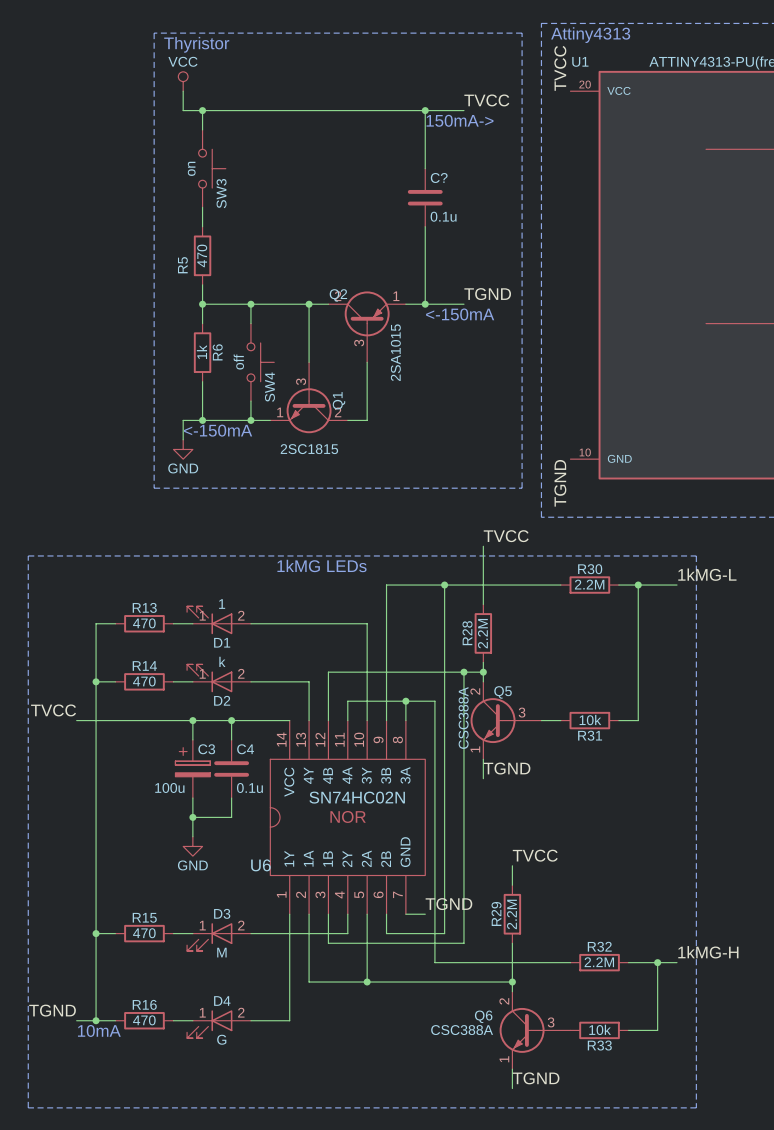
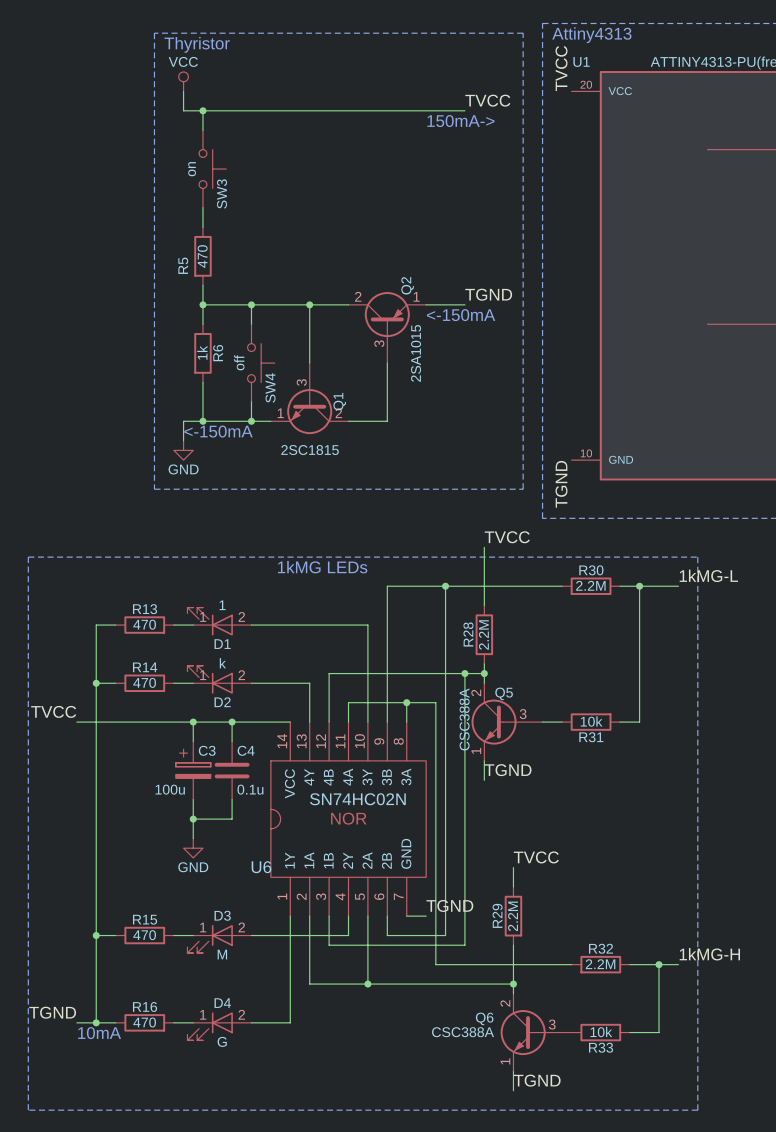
wire: (425, 110) (425, 168) -> none
junction: (425, 110) -> none
C?: 0.1u (425, 197) -> none
wire: (425, 226) (425, 304) (405, 304) -> none
Q2 name rotation: 0° (338, 295) -> 90° counterclockwise (407, 285)
Q2 name position: Q2 (338, 295) -> Q2 (407, 285)
junction: (425, 304) -> none
Q2 position: (367, 326) -> (387, 327)
wire: (367, 362) (367, 420) -> (387, 363) (387, 421) (367, 421)

